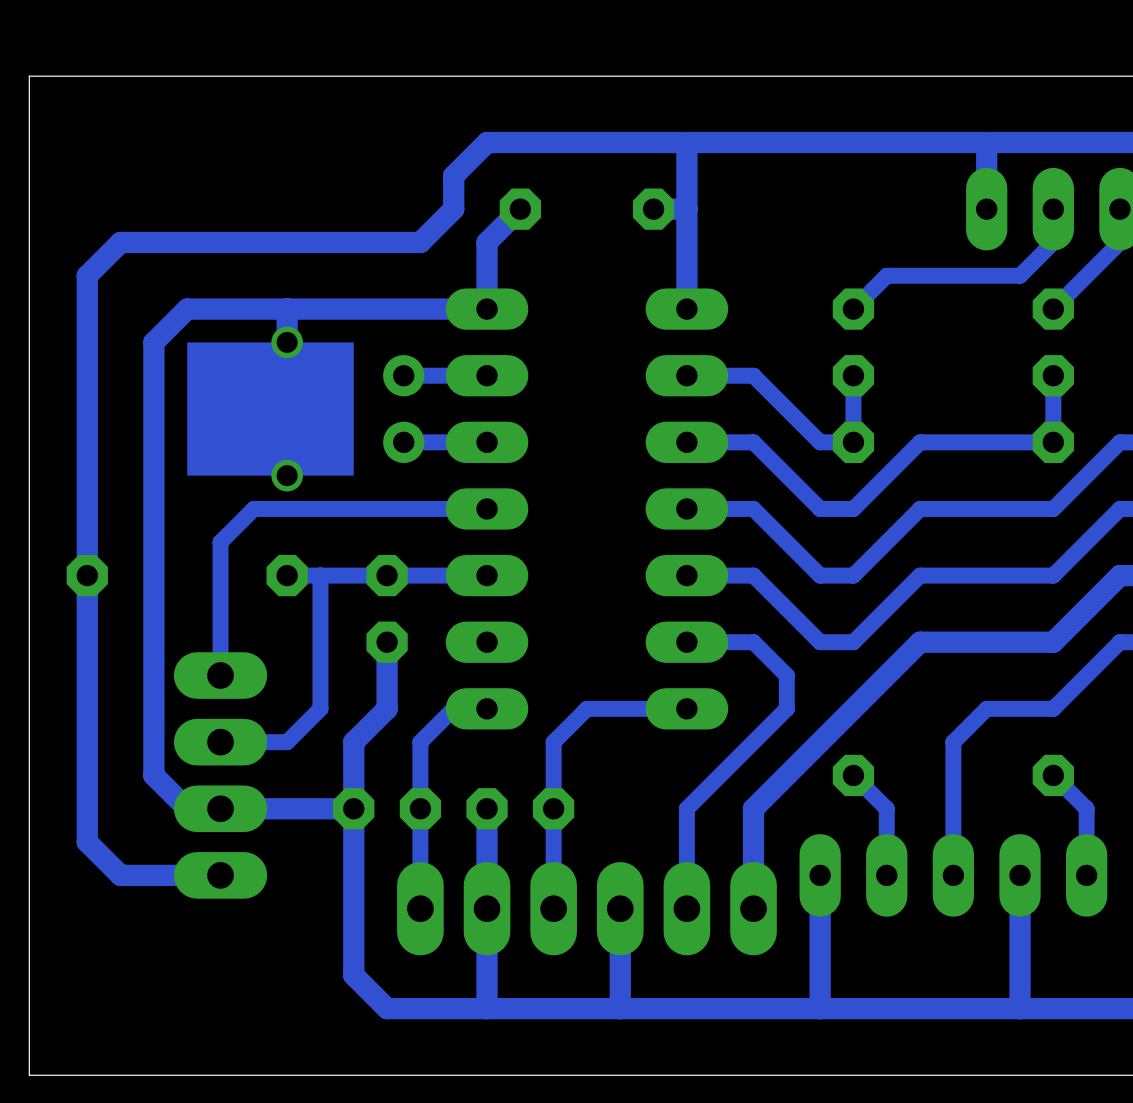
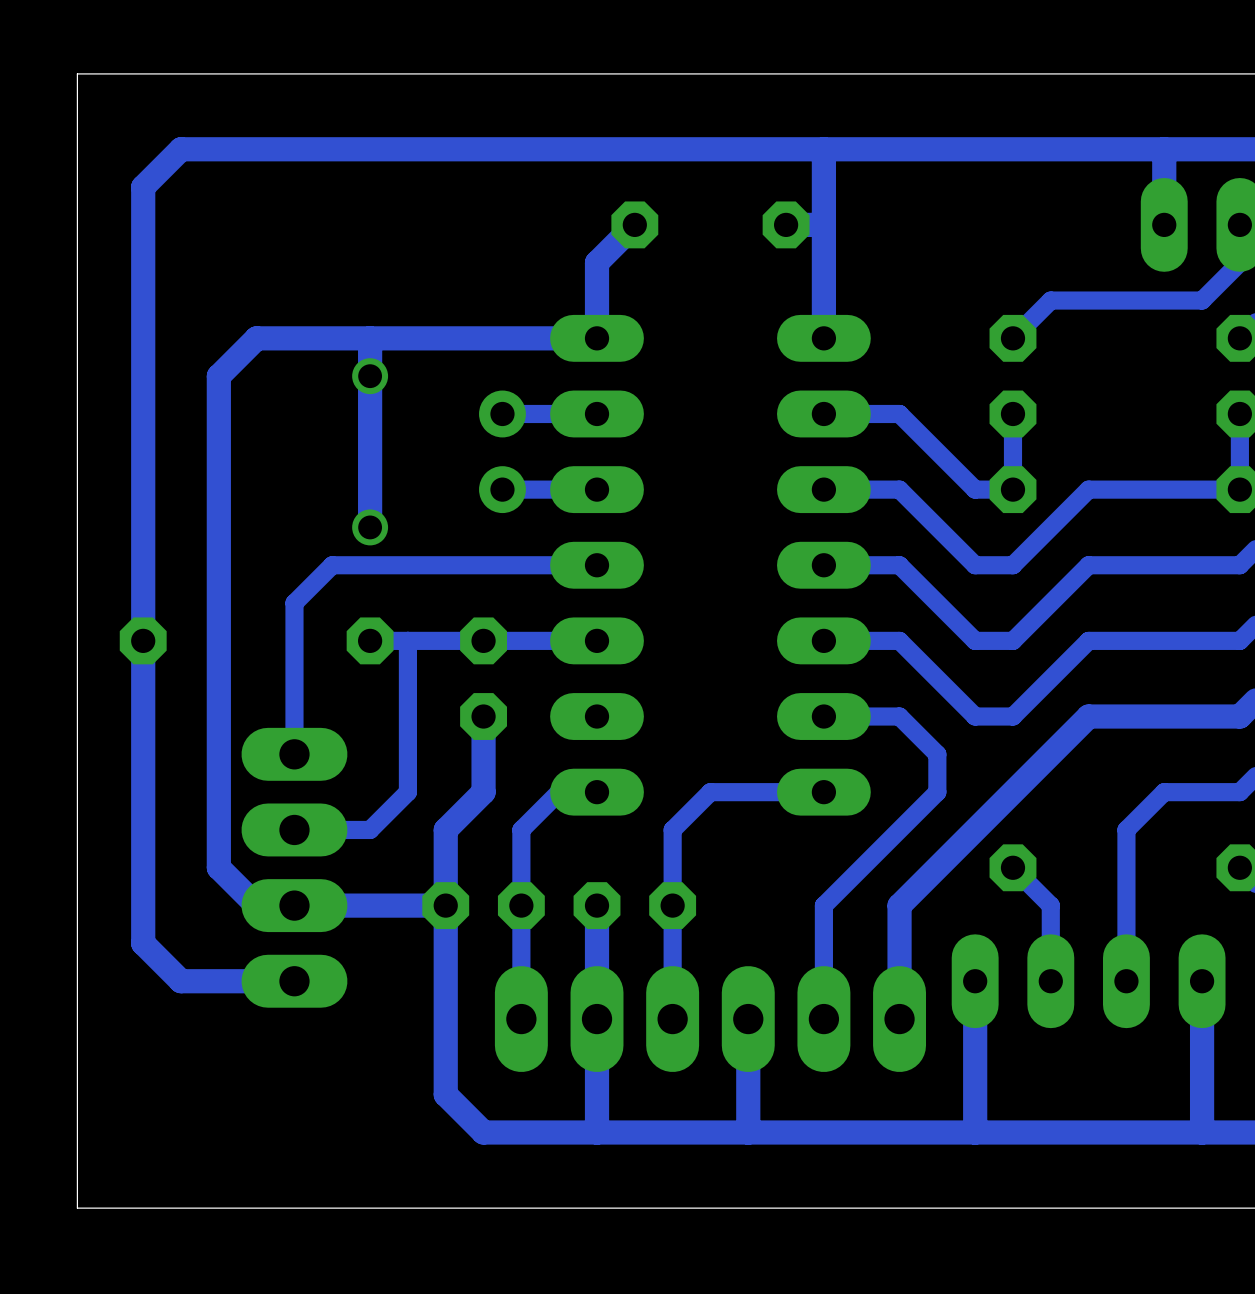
bottom track: (487, 142) (453, 175) (453, 209) (420, 242) (120, 242) (87, 275) -> (597, 149) (181, 149) (143, 187) (143, 300)
drawing: [187, 342, 354, 476] -> none

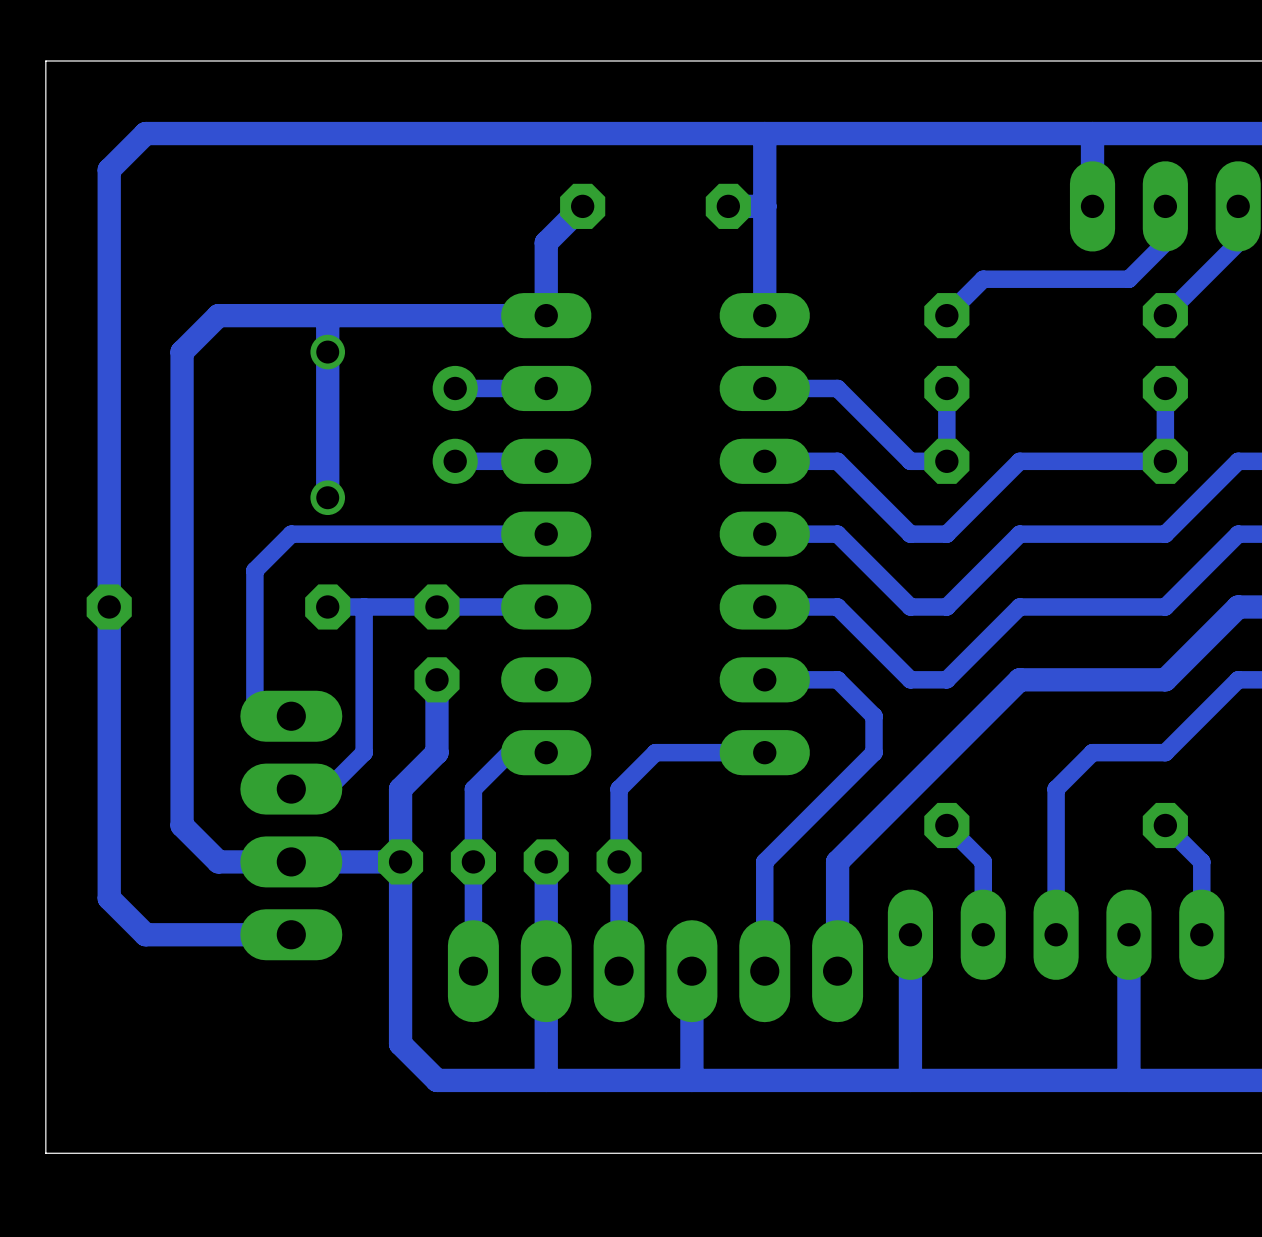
part position: (294, 867) -> (291, 825)

